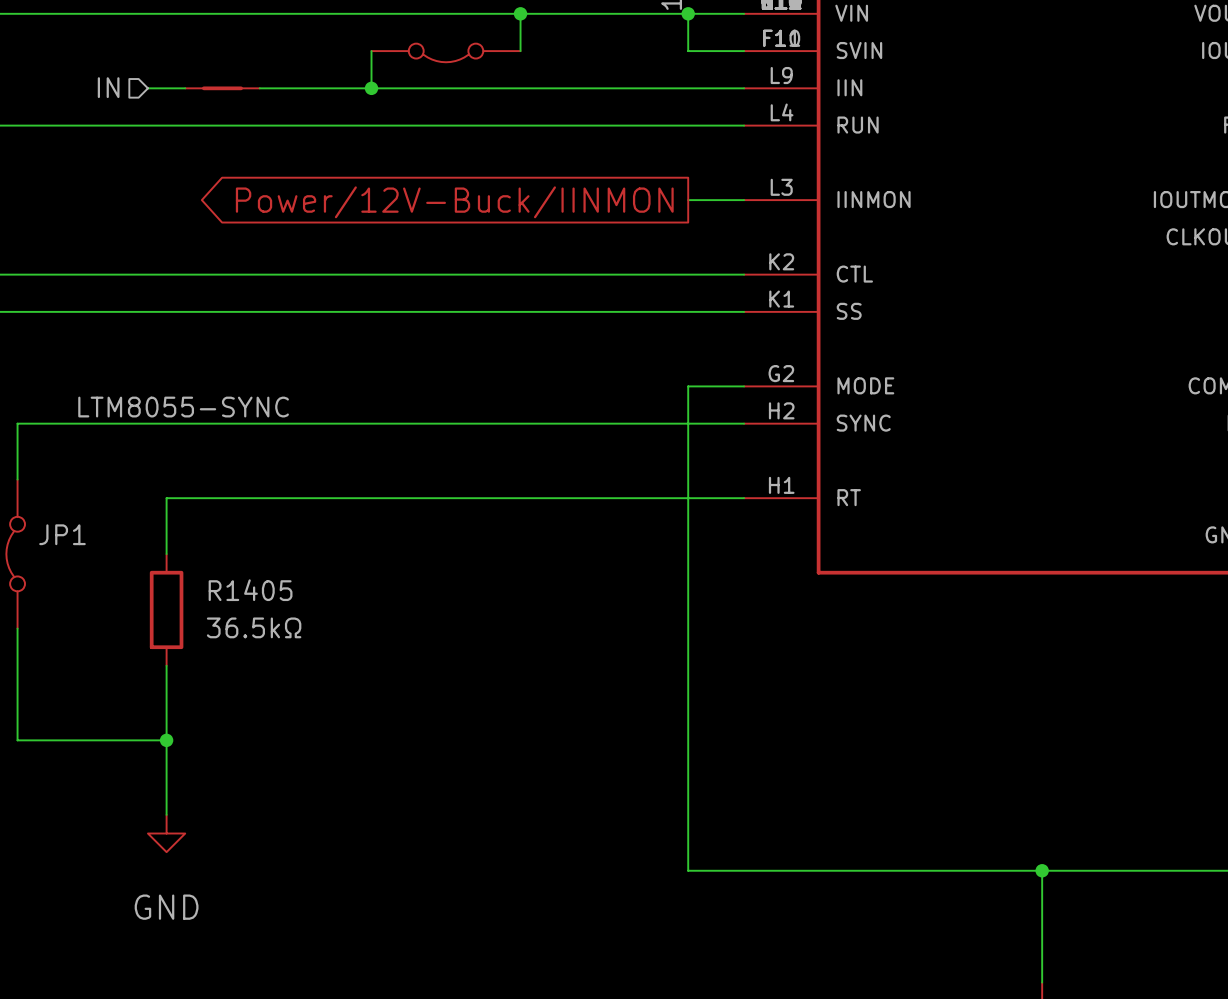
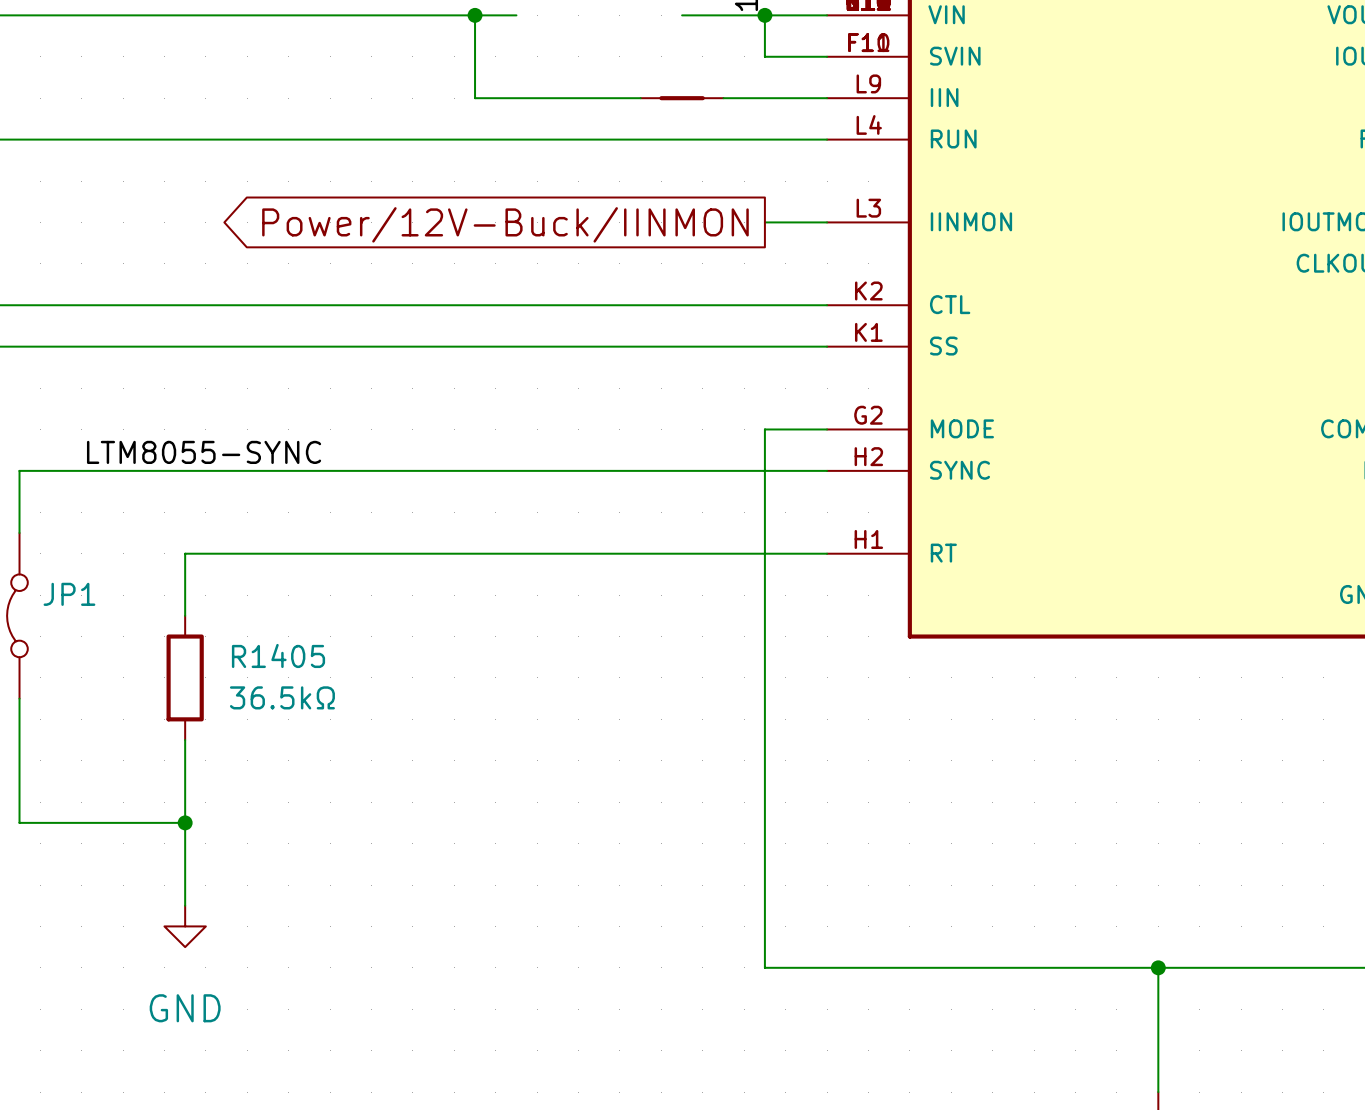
junction: none -> (475, 15)
wire: (464, 13) (613, 13) -> none
wire: (520, 13) (520, 51) -> none
junction: (520, 13) -> none
wire: (371, 51) (371, 88) -> none
part: (446, 52) -> none
hierarchical label: IN (108, 87) -> none
wire: (147, 88) (185, 88) -> none
part: (222, 88) -> none
wire: (259, 88) (427, 88) -> (475, 15) (475, 98)
junction: (371, 88) -> none
part: none -> (682, 98)

